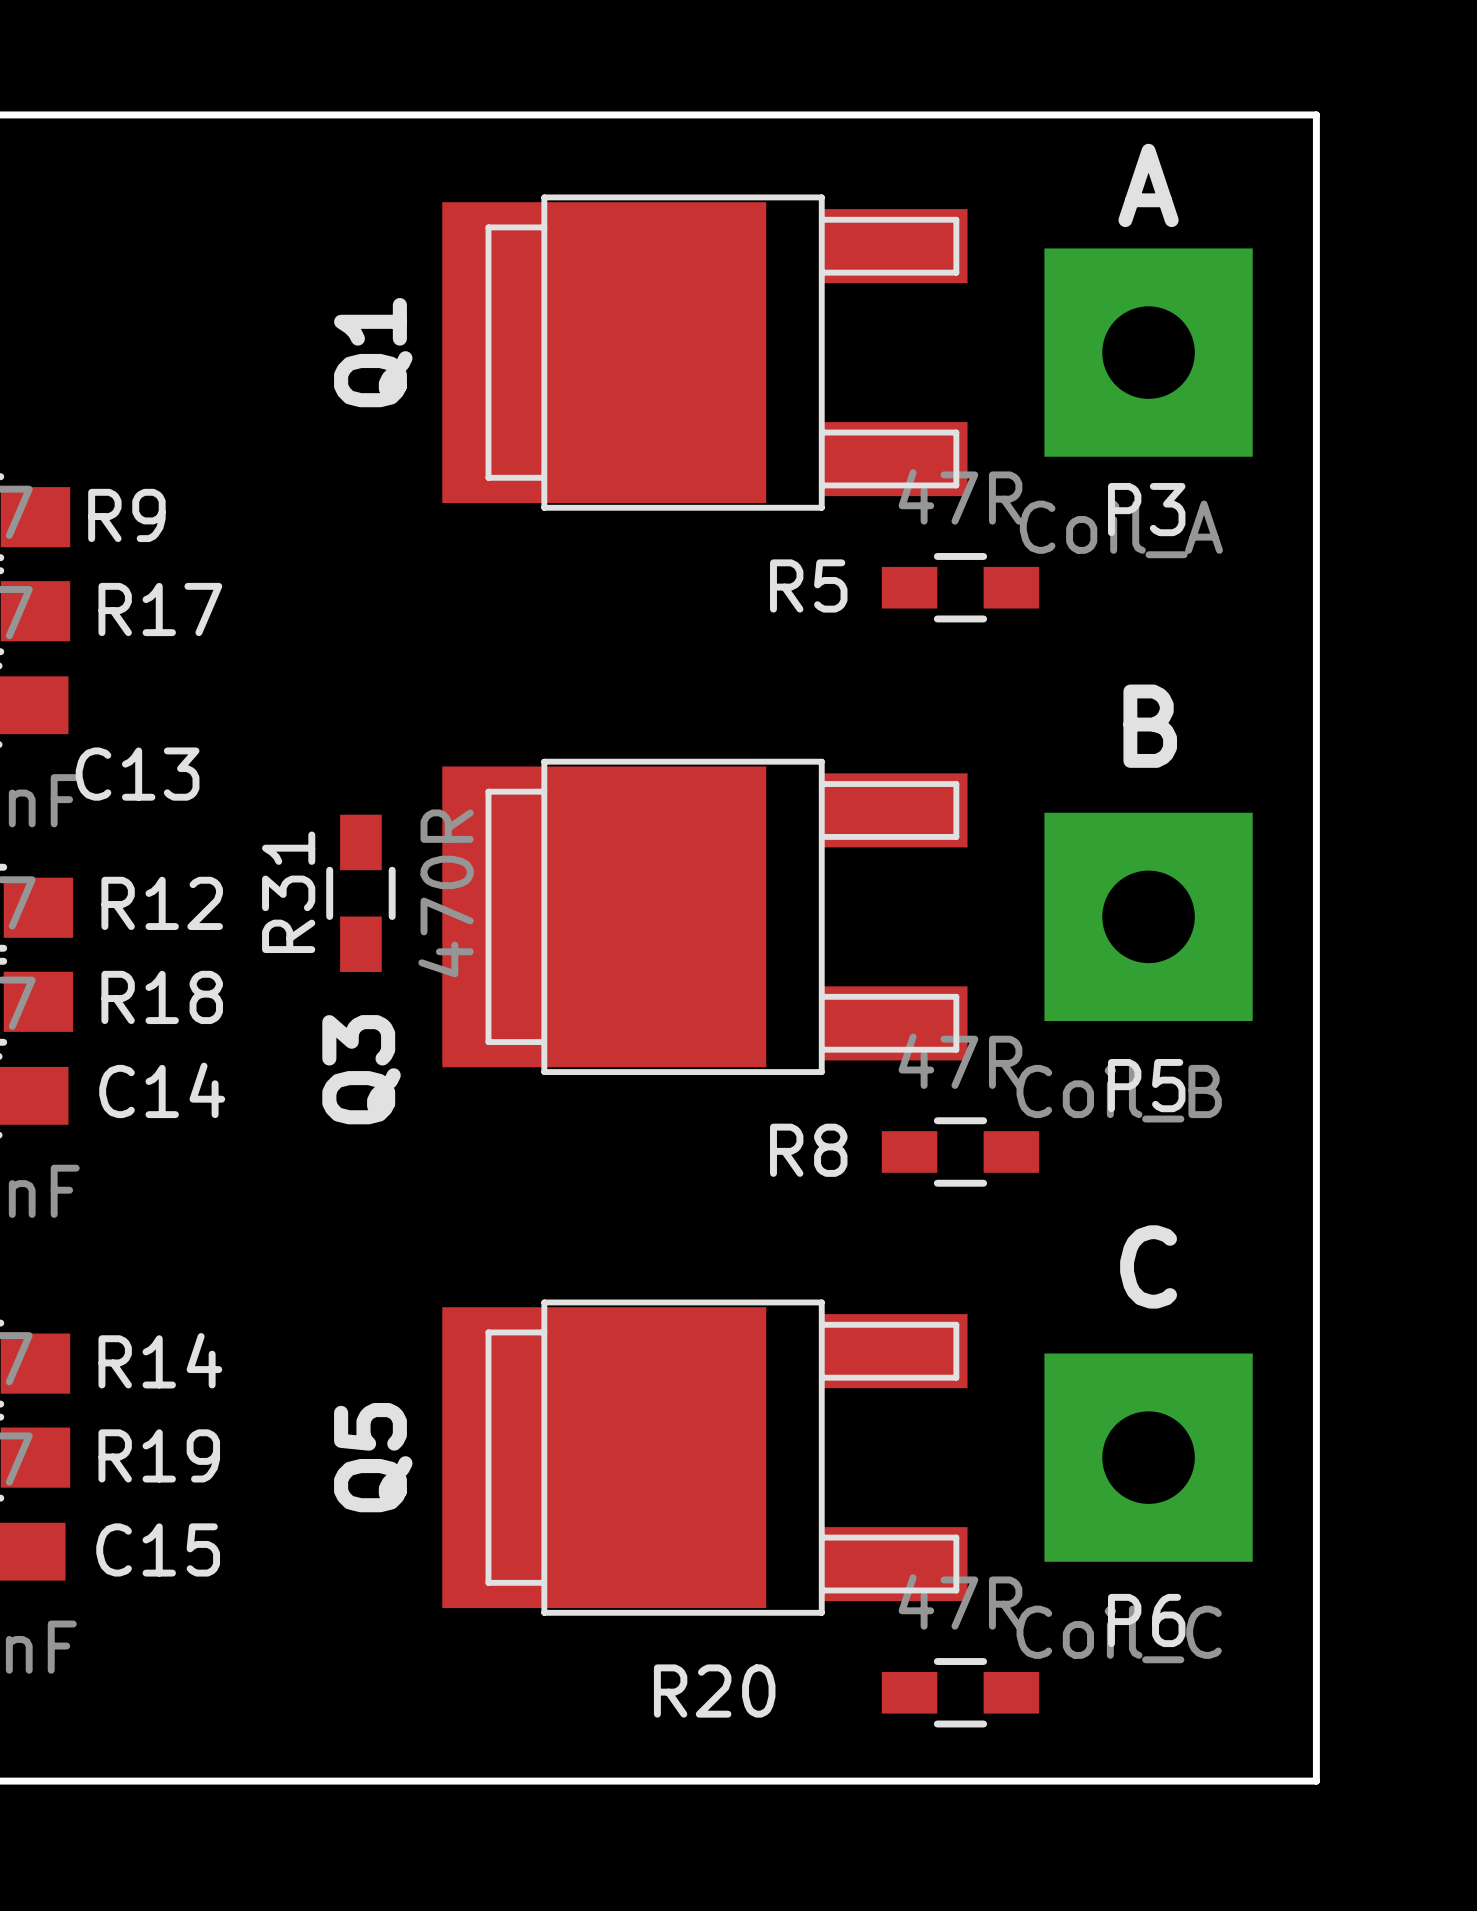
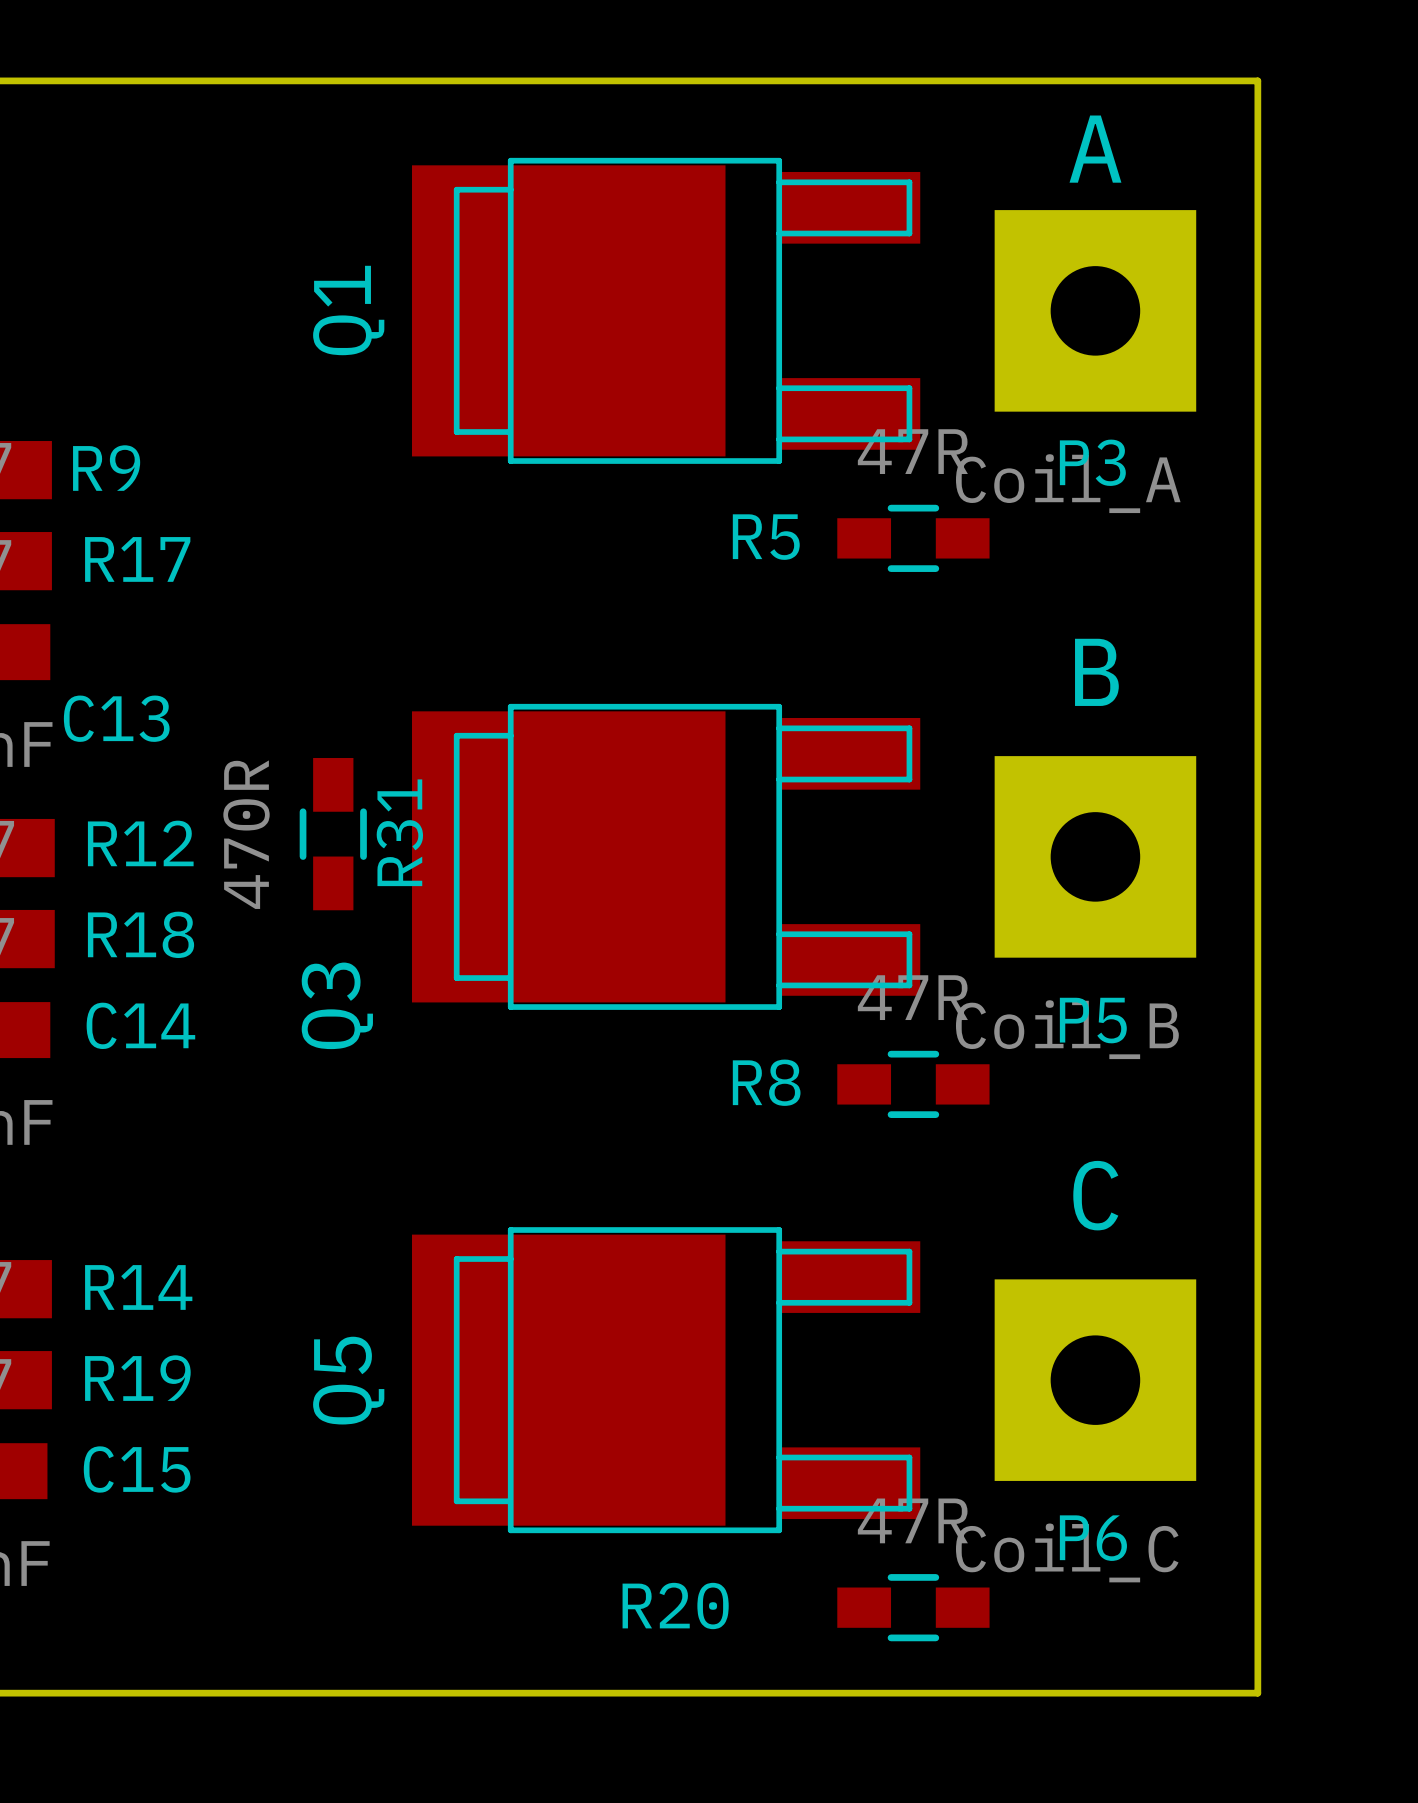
R31 name position: R31 (288, 892) -> R31 (399, 832)
R31 value position: 470R (446, 893) -> 470R (246, 834)

